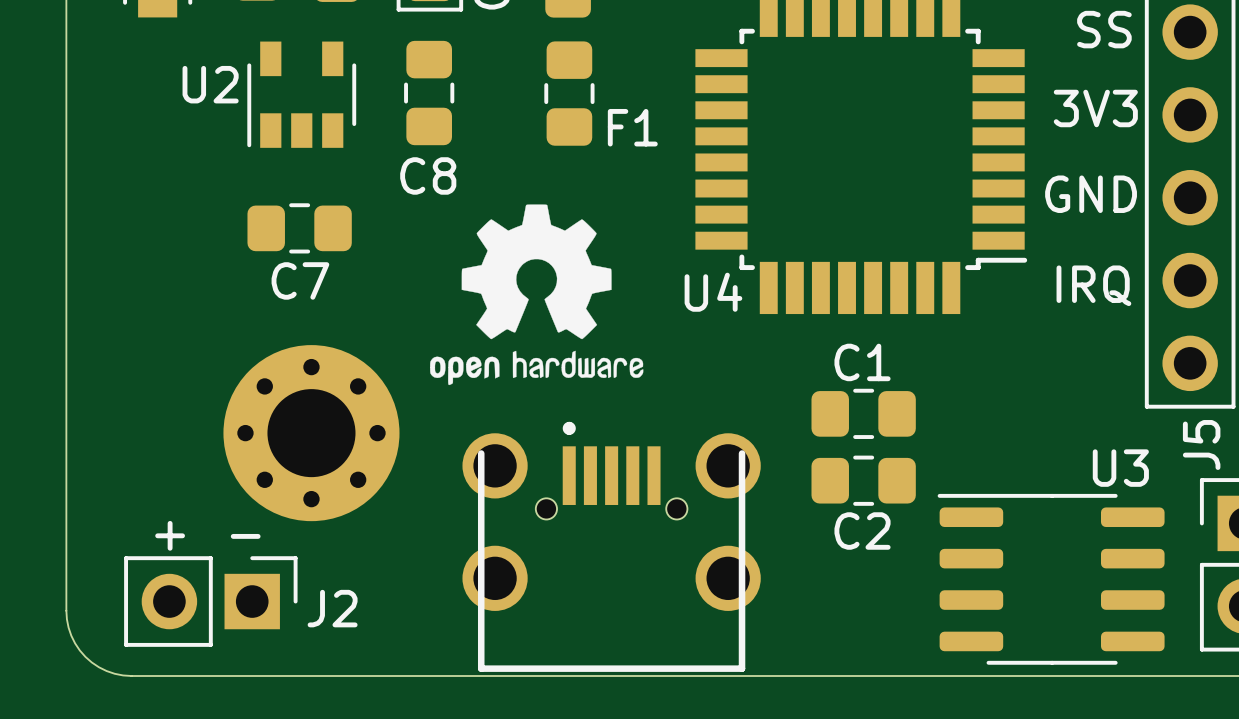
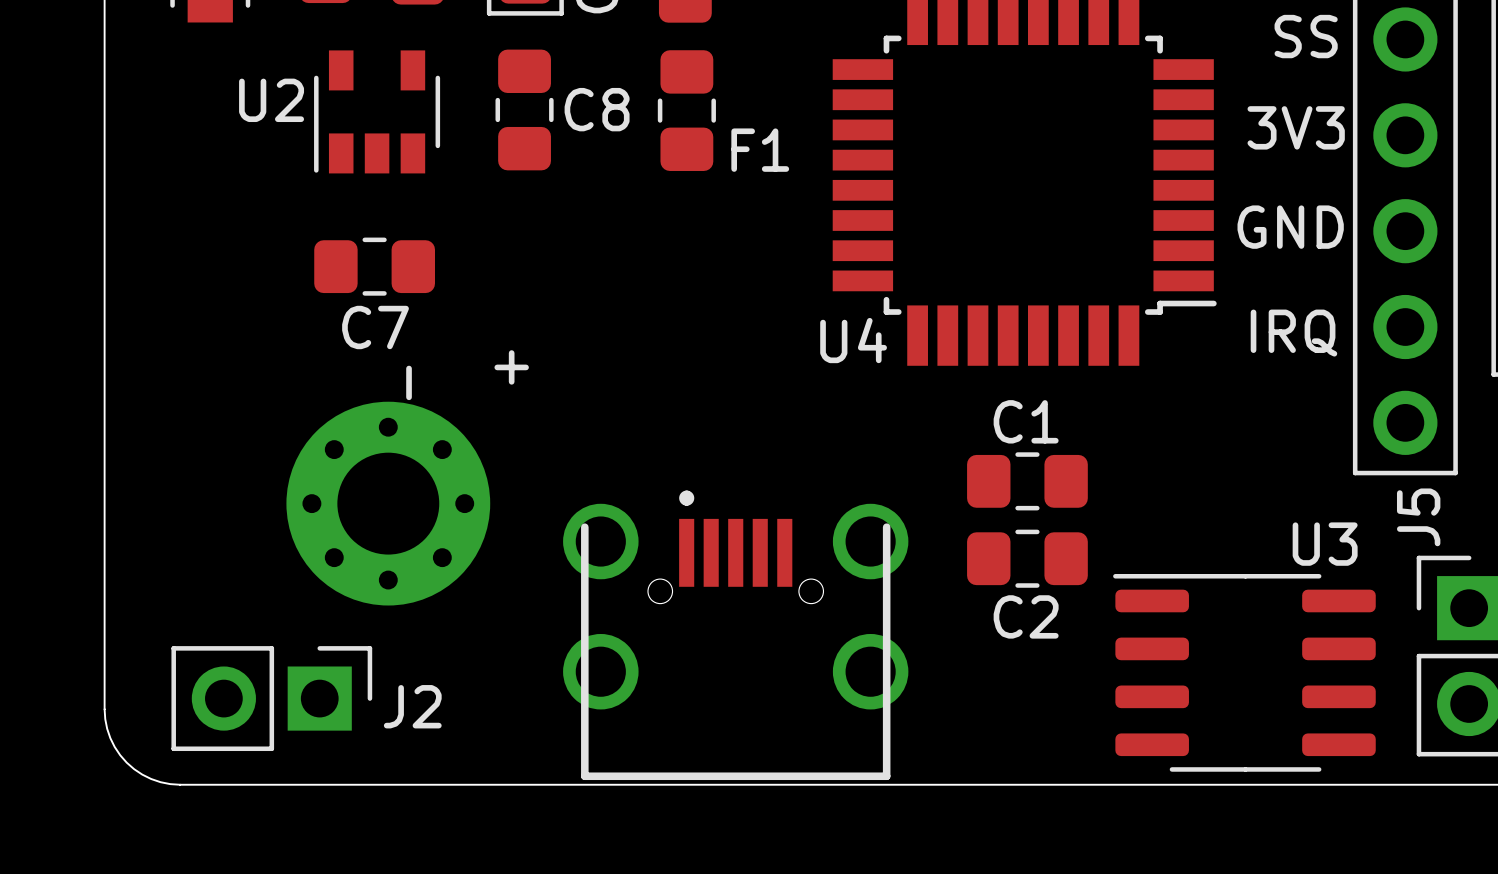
C8 name position: C8 (428, 175) -> C8 (597, 109)
drawing: [430, 204, 644, 386] -> none
text position: + (170, 535) -> + (511, 367)
text rotation: 0° (245, 536) -> 90° clockwise (409, 382)
text position: - (245, 536) -> - (409, 382)

